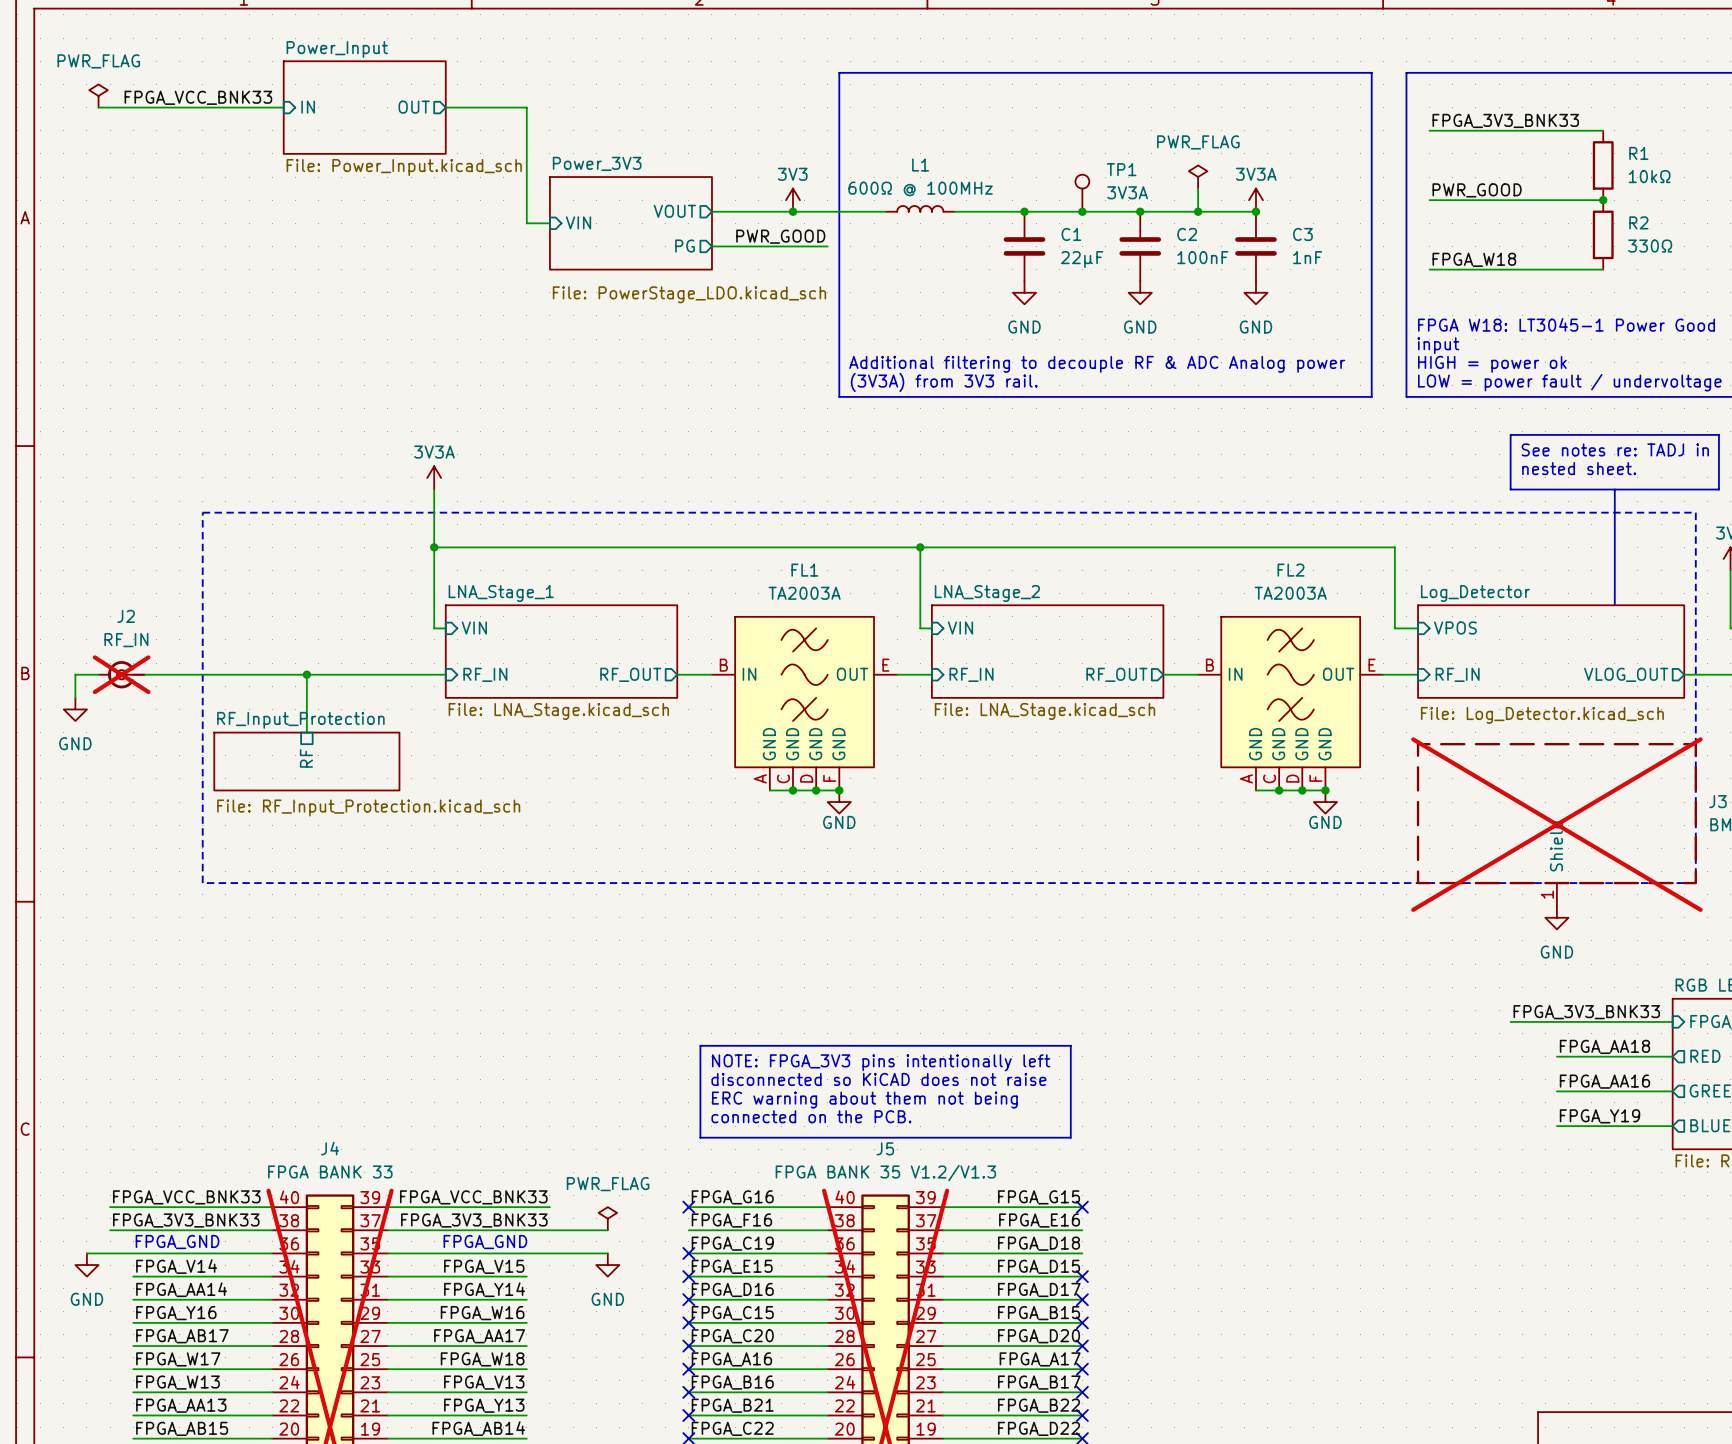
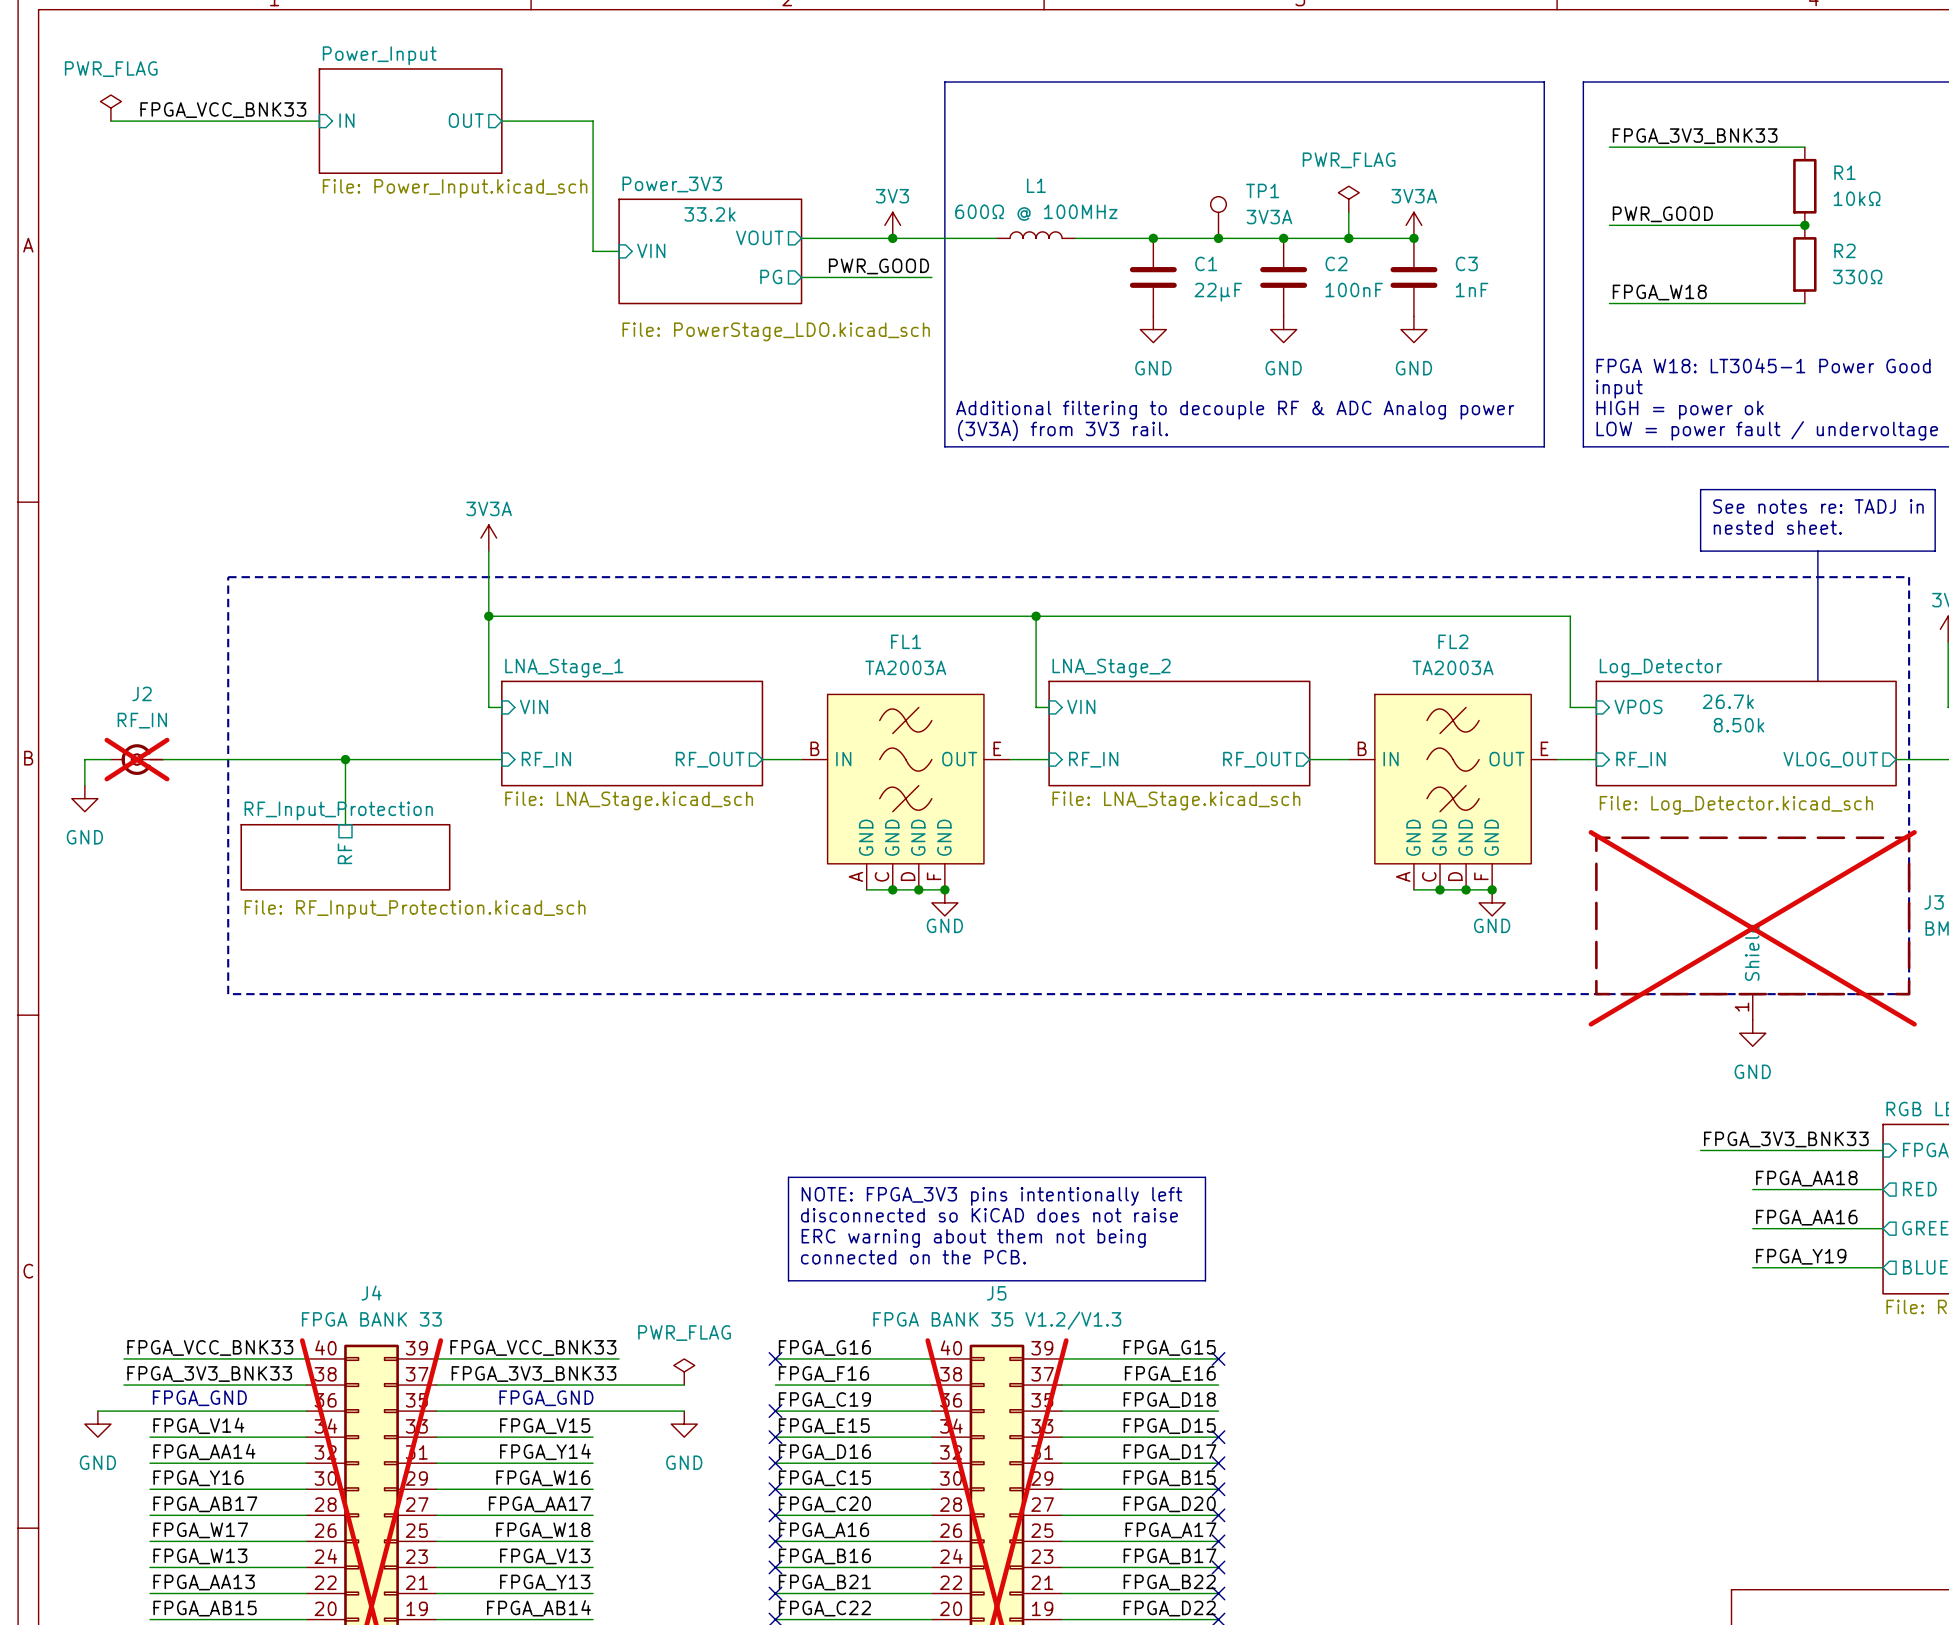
sheet Power_3V3 text: none -> 33.2k (710, 214)
sheet Log_Detector text: none -> 26.7k (1728, 701)
sheet Log_Detector text: none -> 8.50k (1739, 725)

